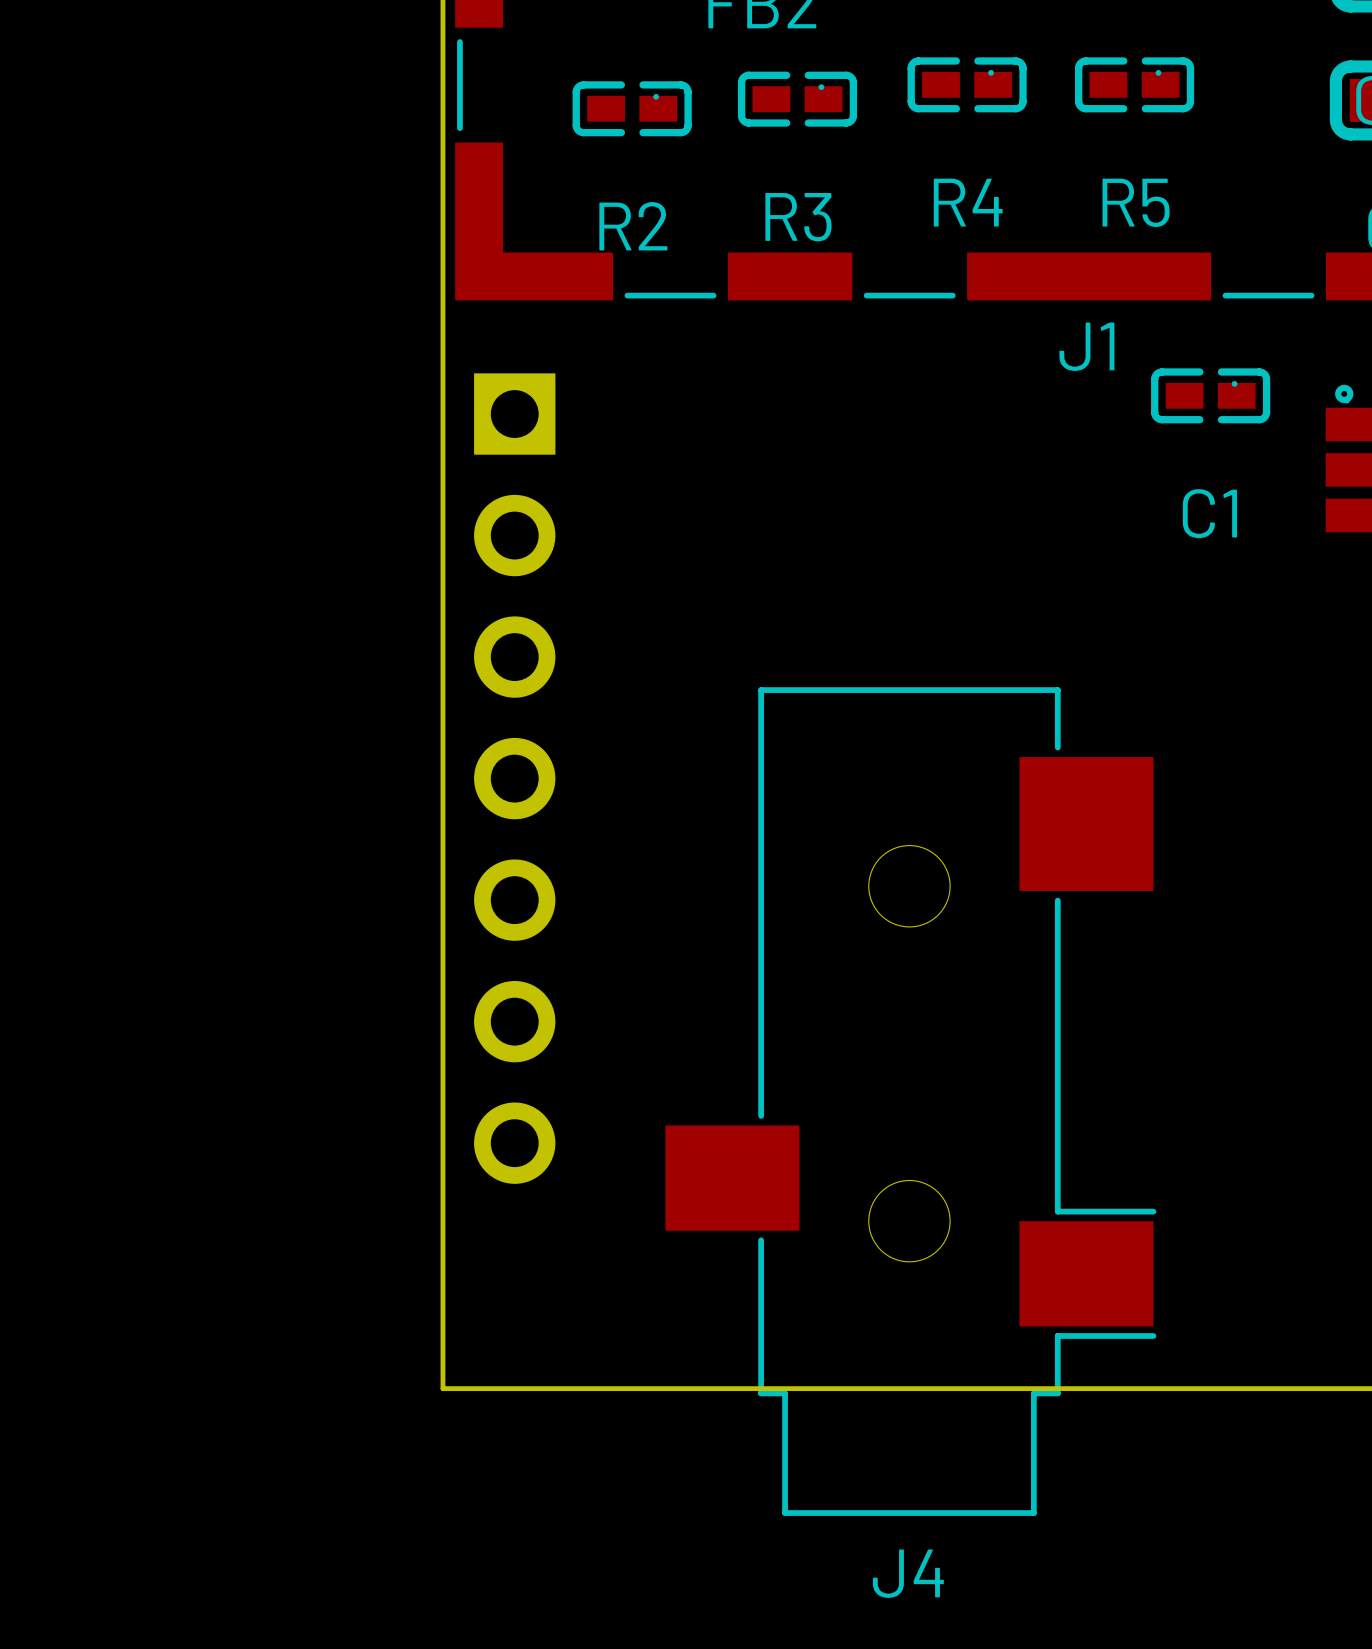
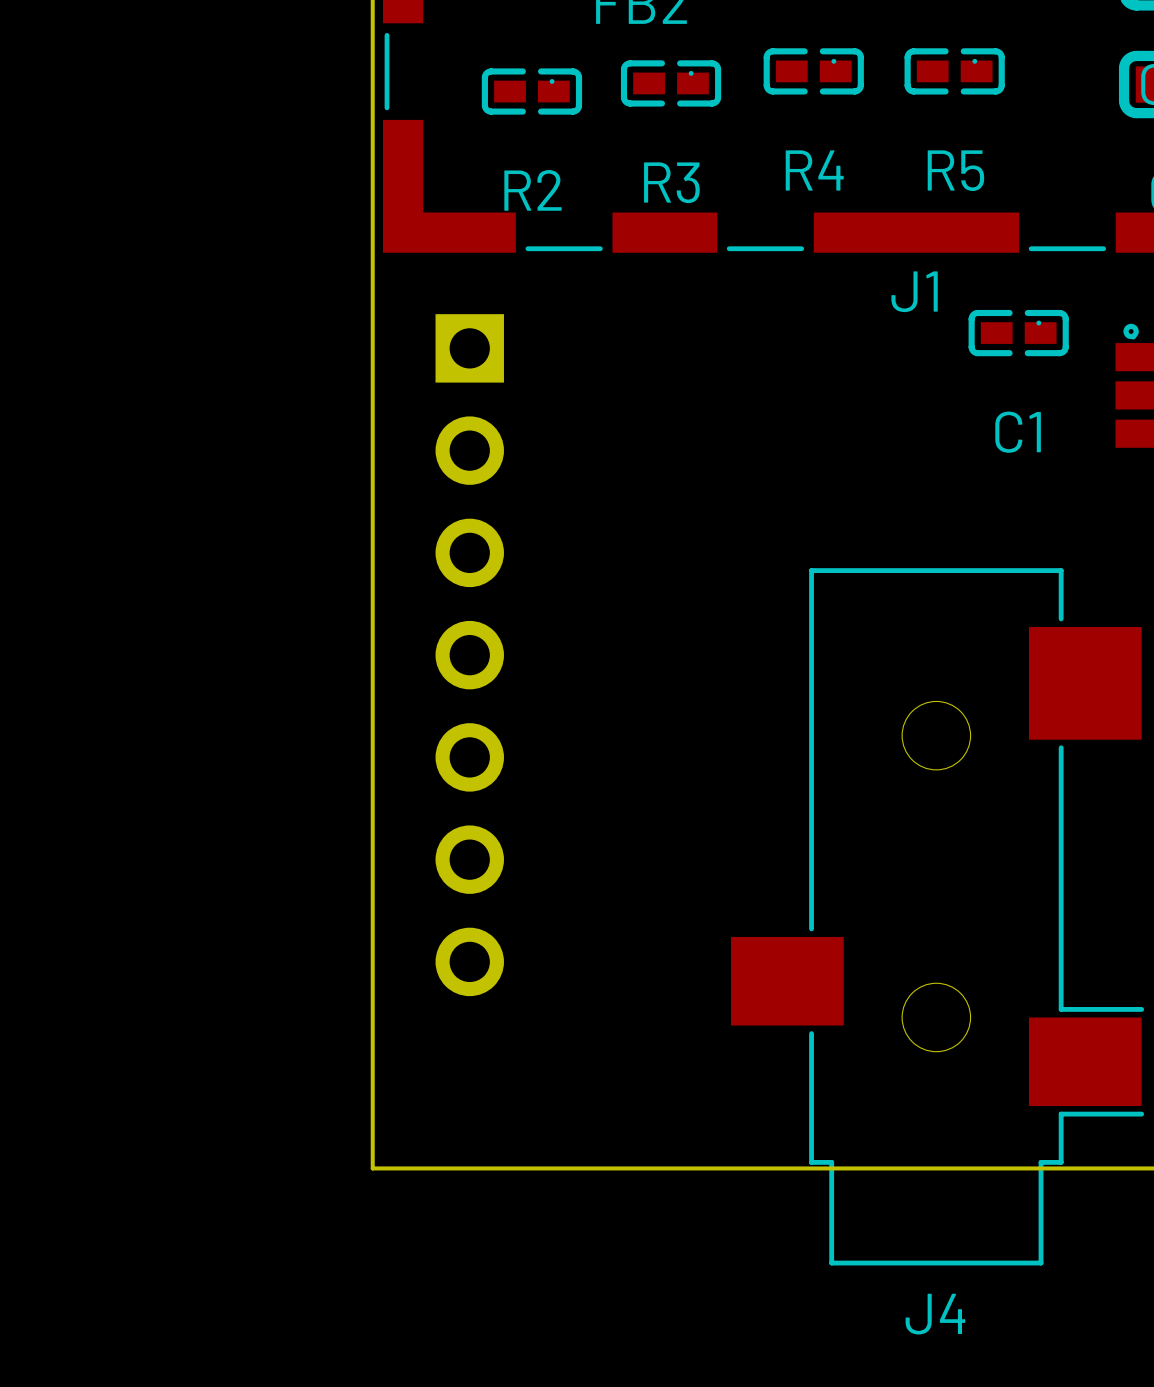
part position: (514, 778) -> (469, 655)
J4 position: (910, 1101) -> (937, 916)

